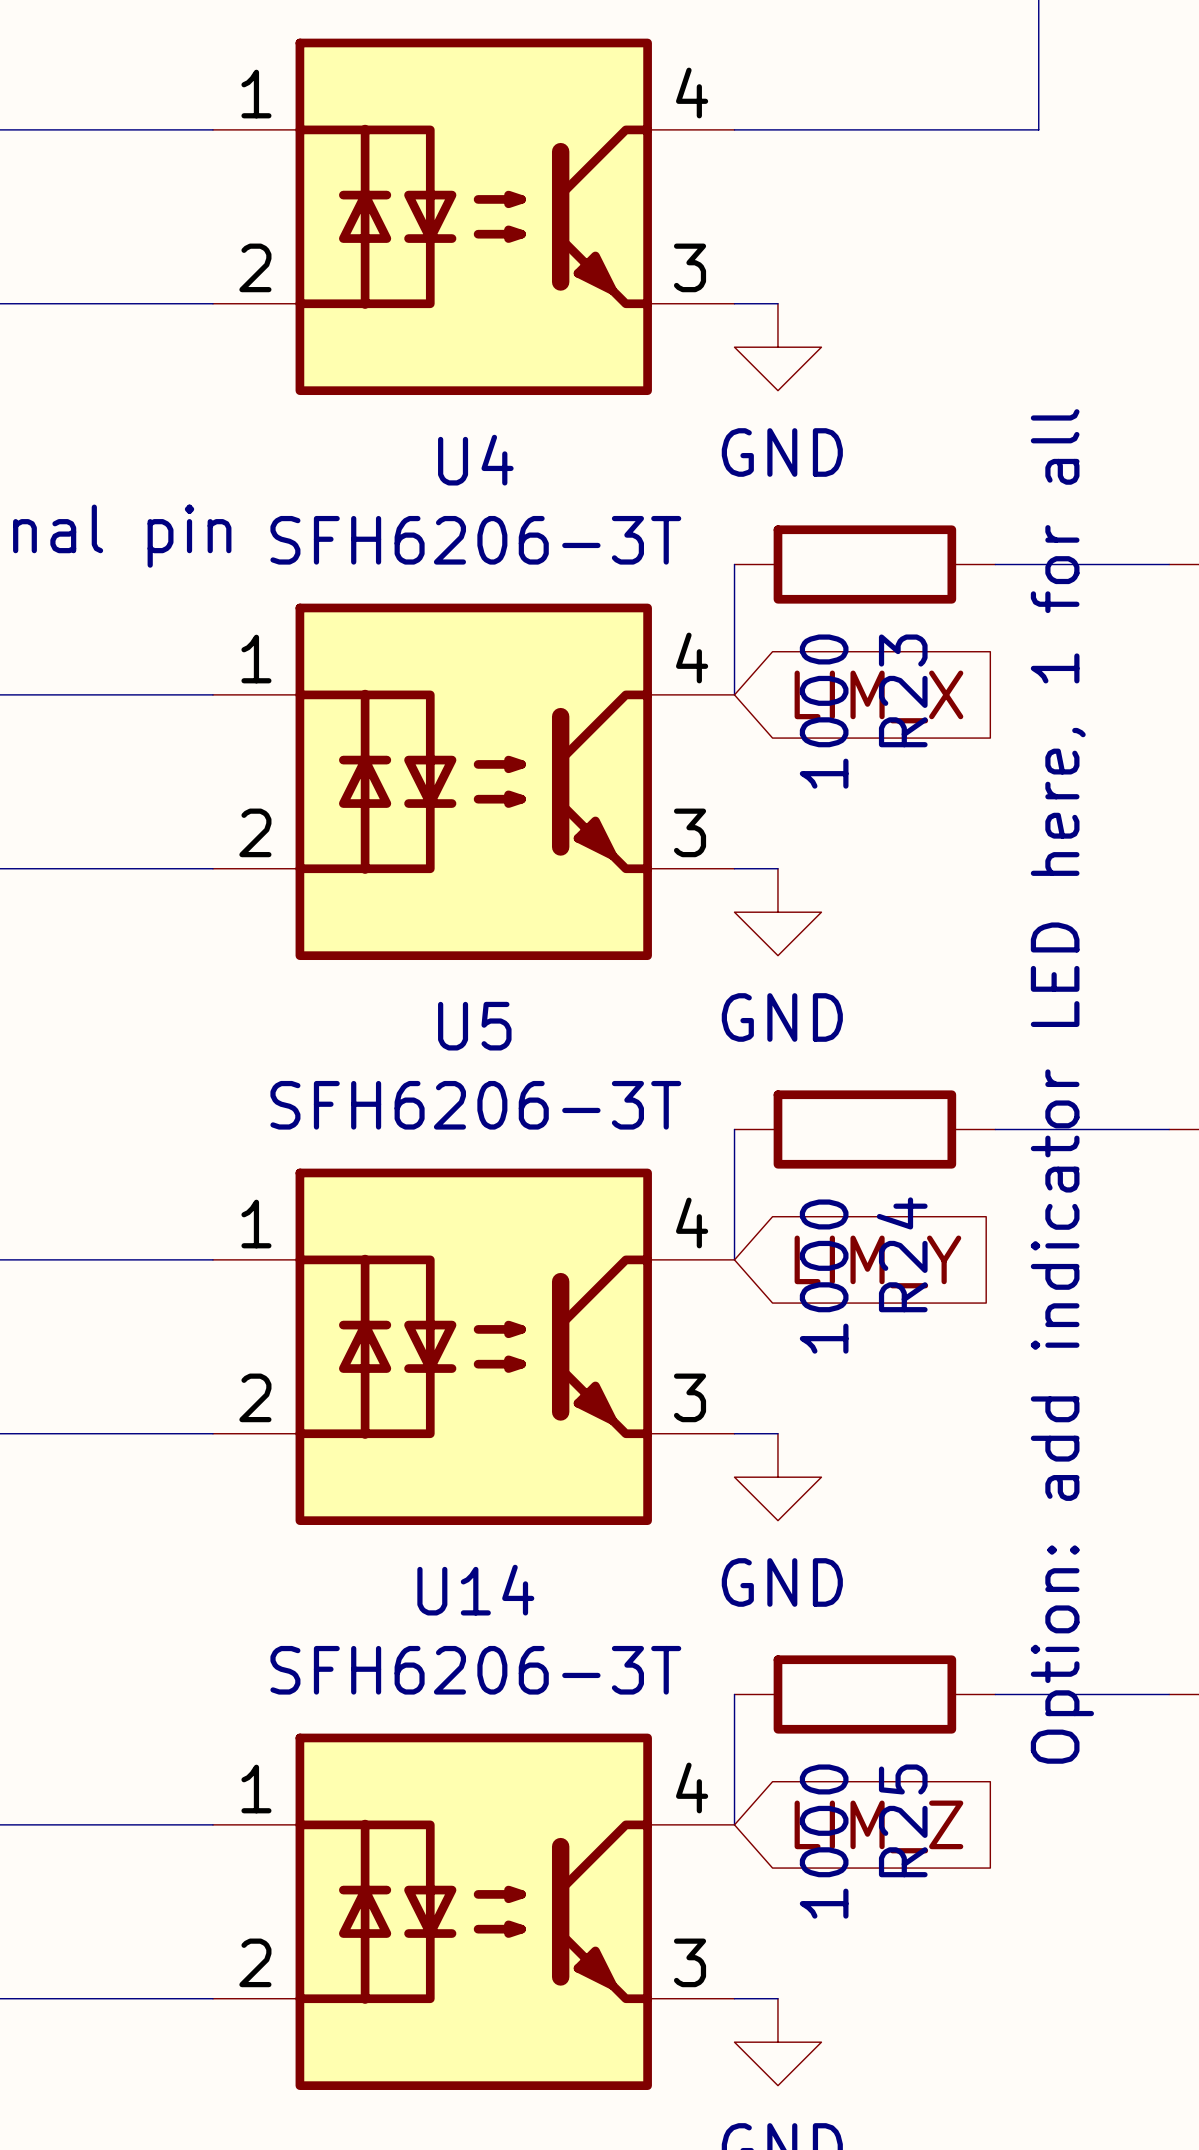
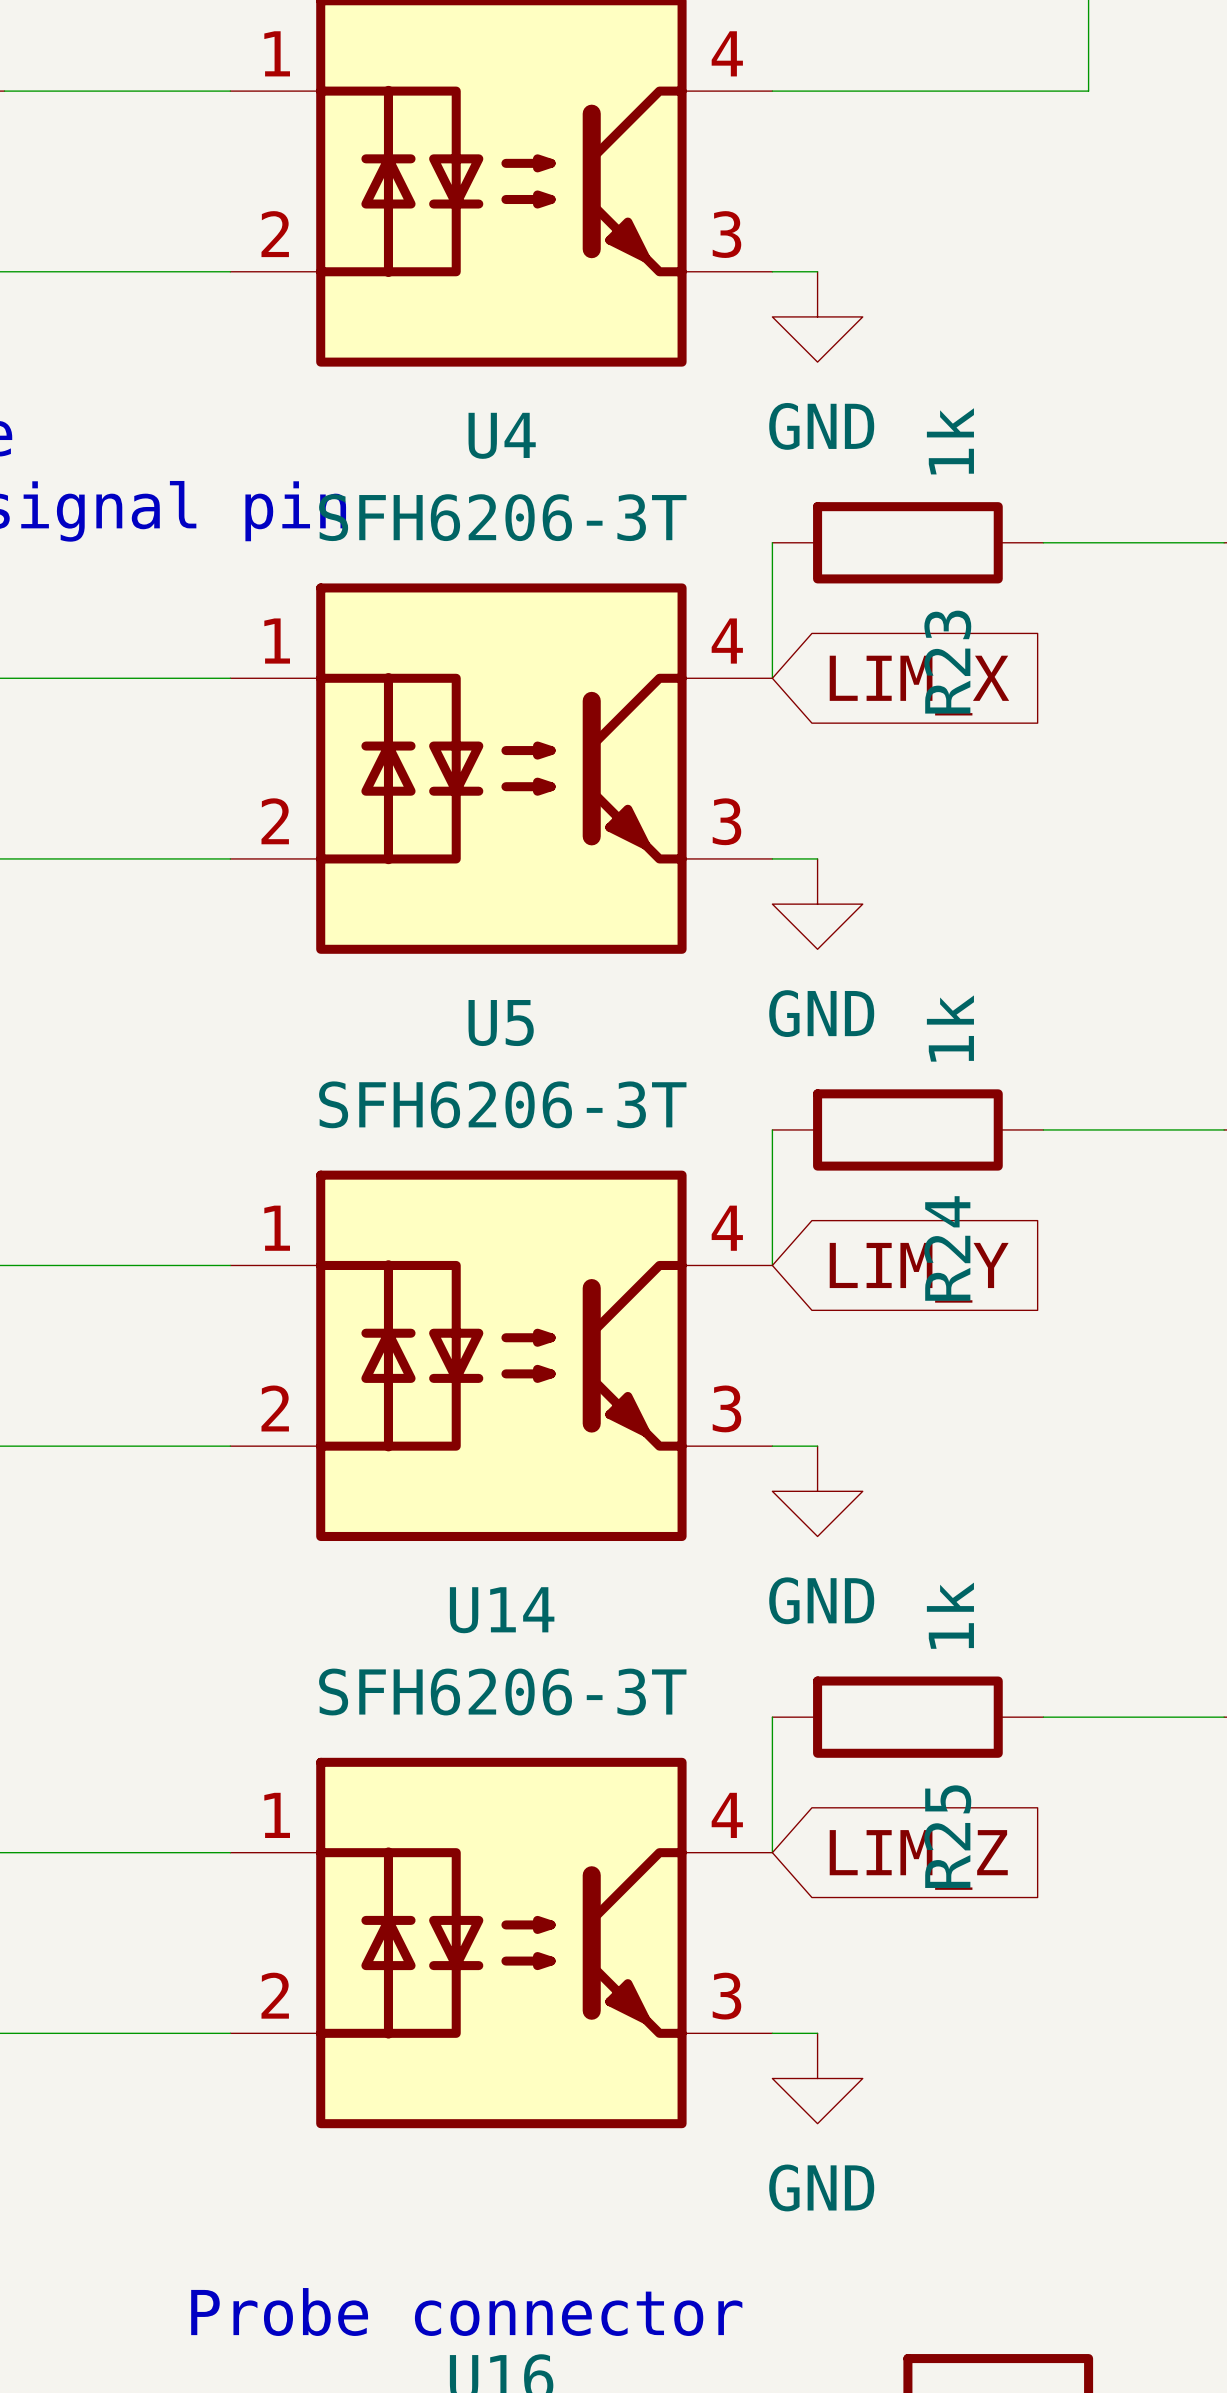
R23 value: 1000 (824, 711) -> 1k (950, 441)
text: Option: add indicator LED here, 1 for all (1062, 1086) -> none
R24 value: 1000 (824, 1276) -> 1k (950, 1028)
R25 value: 1000 (824, 1841) -> 1k (950, 1615)

